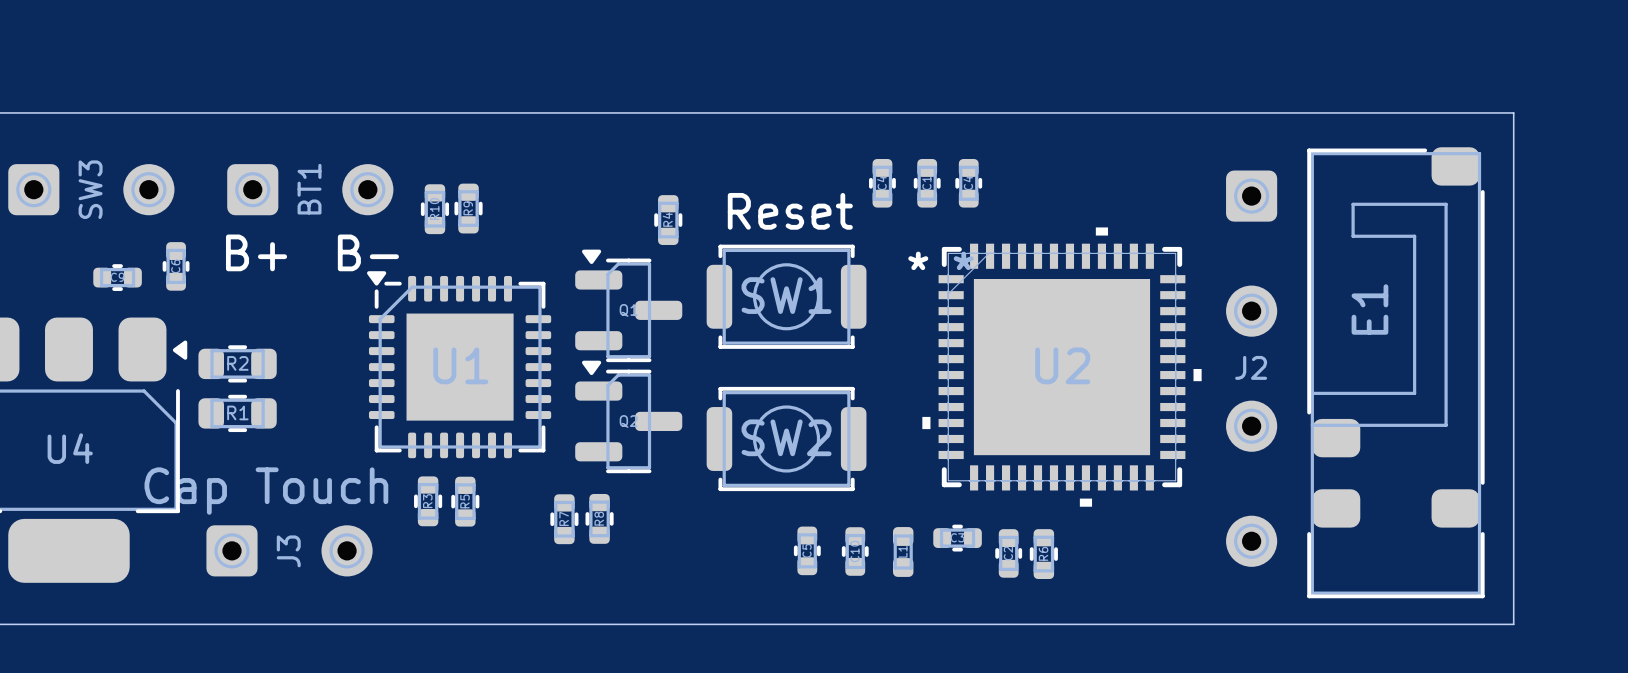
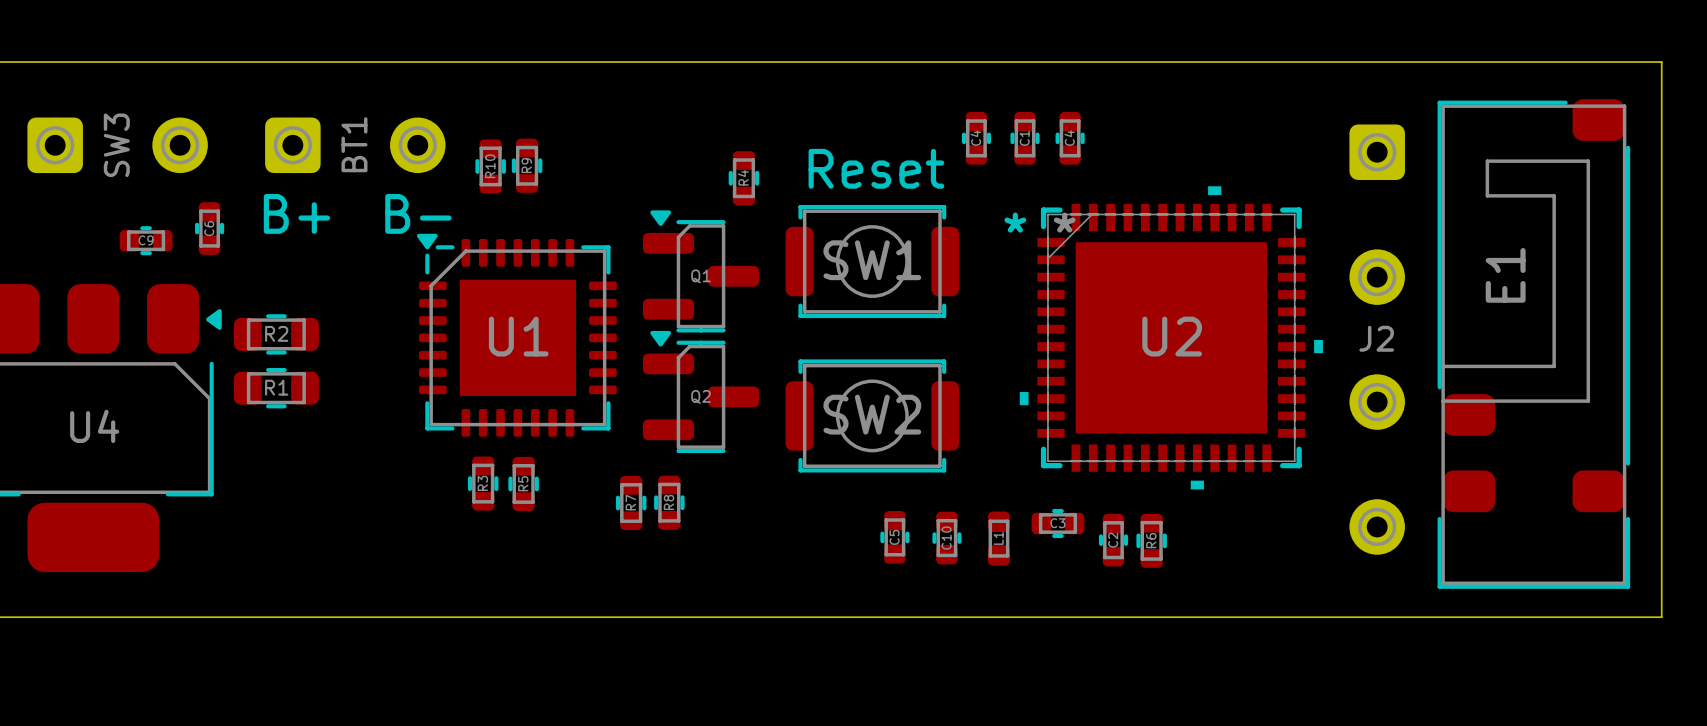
J3: Cap Touch (289, 550) -> none

